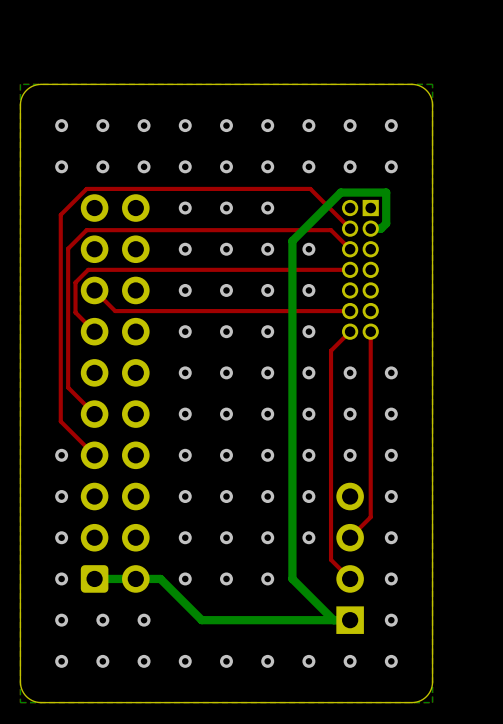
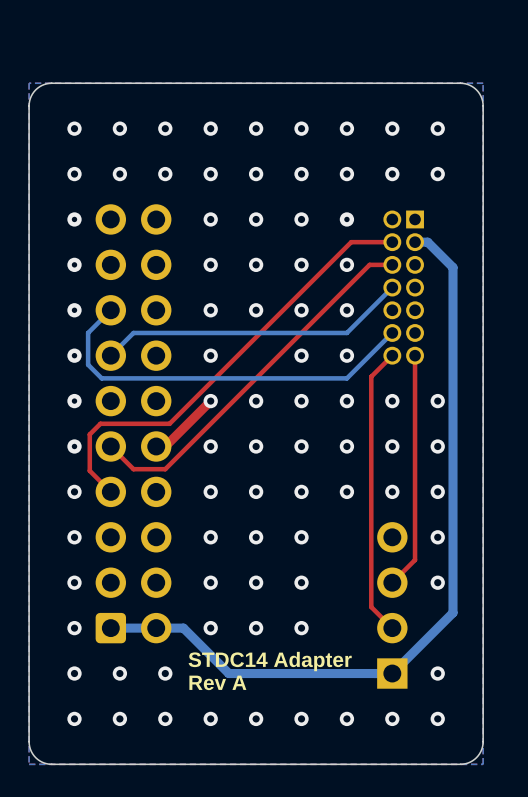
via: none -> (74, 219)
via: none -> (346, 219)
top track: (350, 228) (310, 188) (86, 188) (60, 214) (60, 421) (75, 436) -> (392, 242) (351, 242) (169, 423) (100, 423) (89, 434) (89, 470)
bottom track: (381, 228) (386, 223) (386, 192) (340, 192) (292, 241) (292, 578) (333, 620) -> (426, 242) (453, 267) (453, 612) (392, 673)
via: none -> (74, 264)
top track: (350, 249) (331, 230) (86, 230) (68, 248) (68, 387) (94, 414) -> (392, 264) (369, 264) (165, 469) (133, 469) (110, 446)
bottom track: none -> (392, 287) (346, 332) (133, 332) (110, 355)
top track: (350, 269) (88, 269) (75, 282) (75, 312) (94, 331) -> none
via: none -> (74, 310)
bottom track: none -> (110, 310) (88, 332) (88, 364) (101, 378) (346, 378) (392, 332)
top track: (94, 290) (115, 311) (350, 311) -> none
via: none -> (74, 355)
via: (226, 331) -> none
via: none -> (74, 401)
top track: none -> (210, 401) (165, 446) (156, 446)
via: none -> (74, 446)
via: (308, 496) -> none
via: (308, 537) -> none
via: (391, 578) -> none
text: none -> STDC14 Adapter (270, 661)
text: none -> Rev A (217, 682)

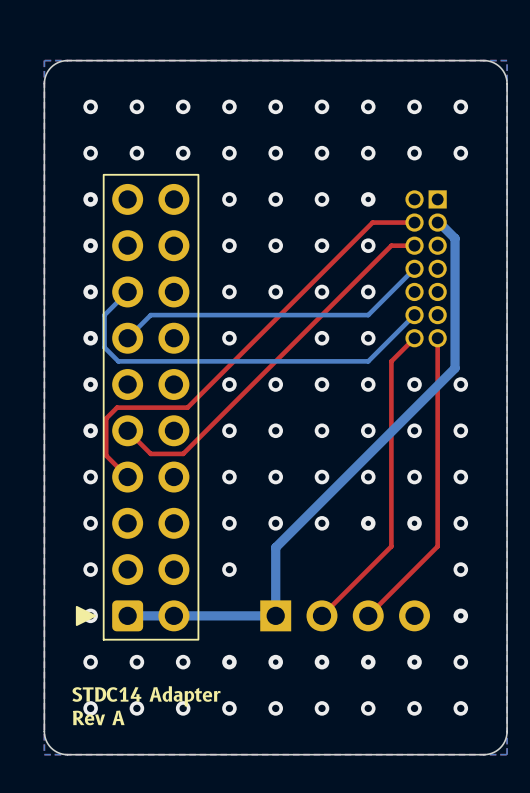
part footprint: [95, 204, 172, 644] -> [75, 173, 200, 641]
bottom track: (416, 242) (427, 242) (453, 267) (453, 612) (392, 673) (228, 673) (183, 628) -> (439, 222) (455, 238) (455, 368) (275, 547) (275, 615) (201, 615)
top track: (371, 376) (371, 607) (392, 628) -> (393, 359) (391, 361) (391, 546) (321, 615)
top track: (210, 401) (165, 446) -> (414, 569) (368, 615)
via: none -> (368, 523)
via: none -> (414, 523)
via: (256, 582) -> none
via: (301, 582) -> none
part rotation: 0° (392, 605) -> 90° clockwise (345, 615)
via: (210, 628) -> none
via: (256, 628) -> none
via: (301, 628) -> none
via: none -> (460, 615)
text position: STDC14 Adapter (270, 661) -> STDC14 Adapter (146, 696)
via: none -> (229, 662)
via: none -> (275, 662)
via: none -> (321, 662)
via: none -> (368, 662)
via: none -> (414, 662)
text position: Rev A (217, 682) -> Rev A (98, 717)

